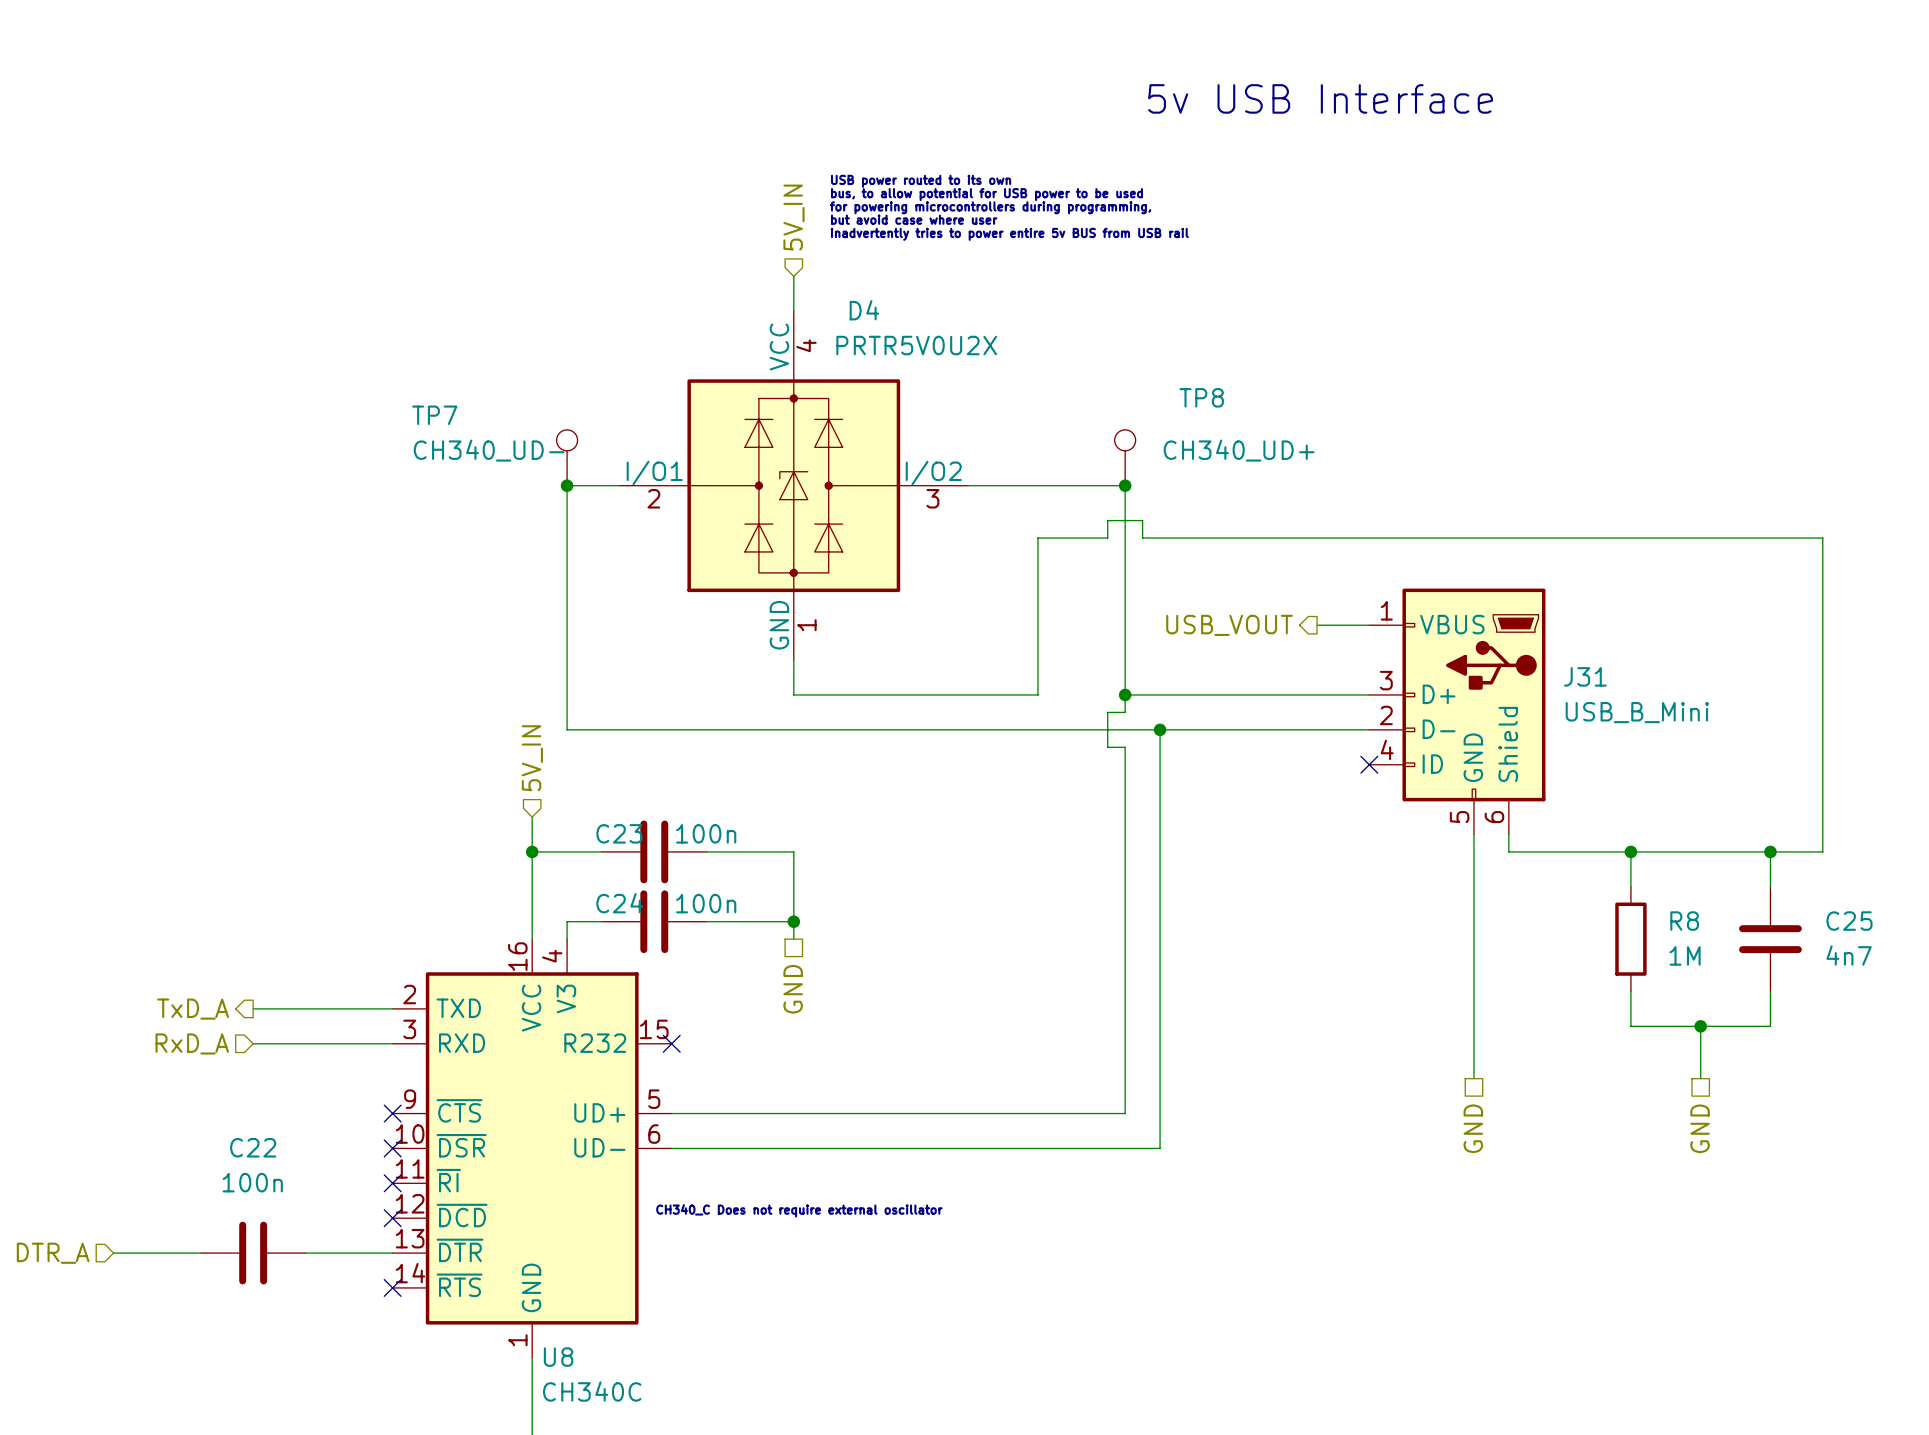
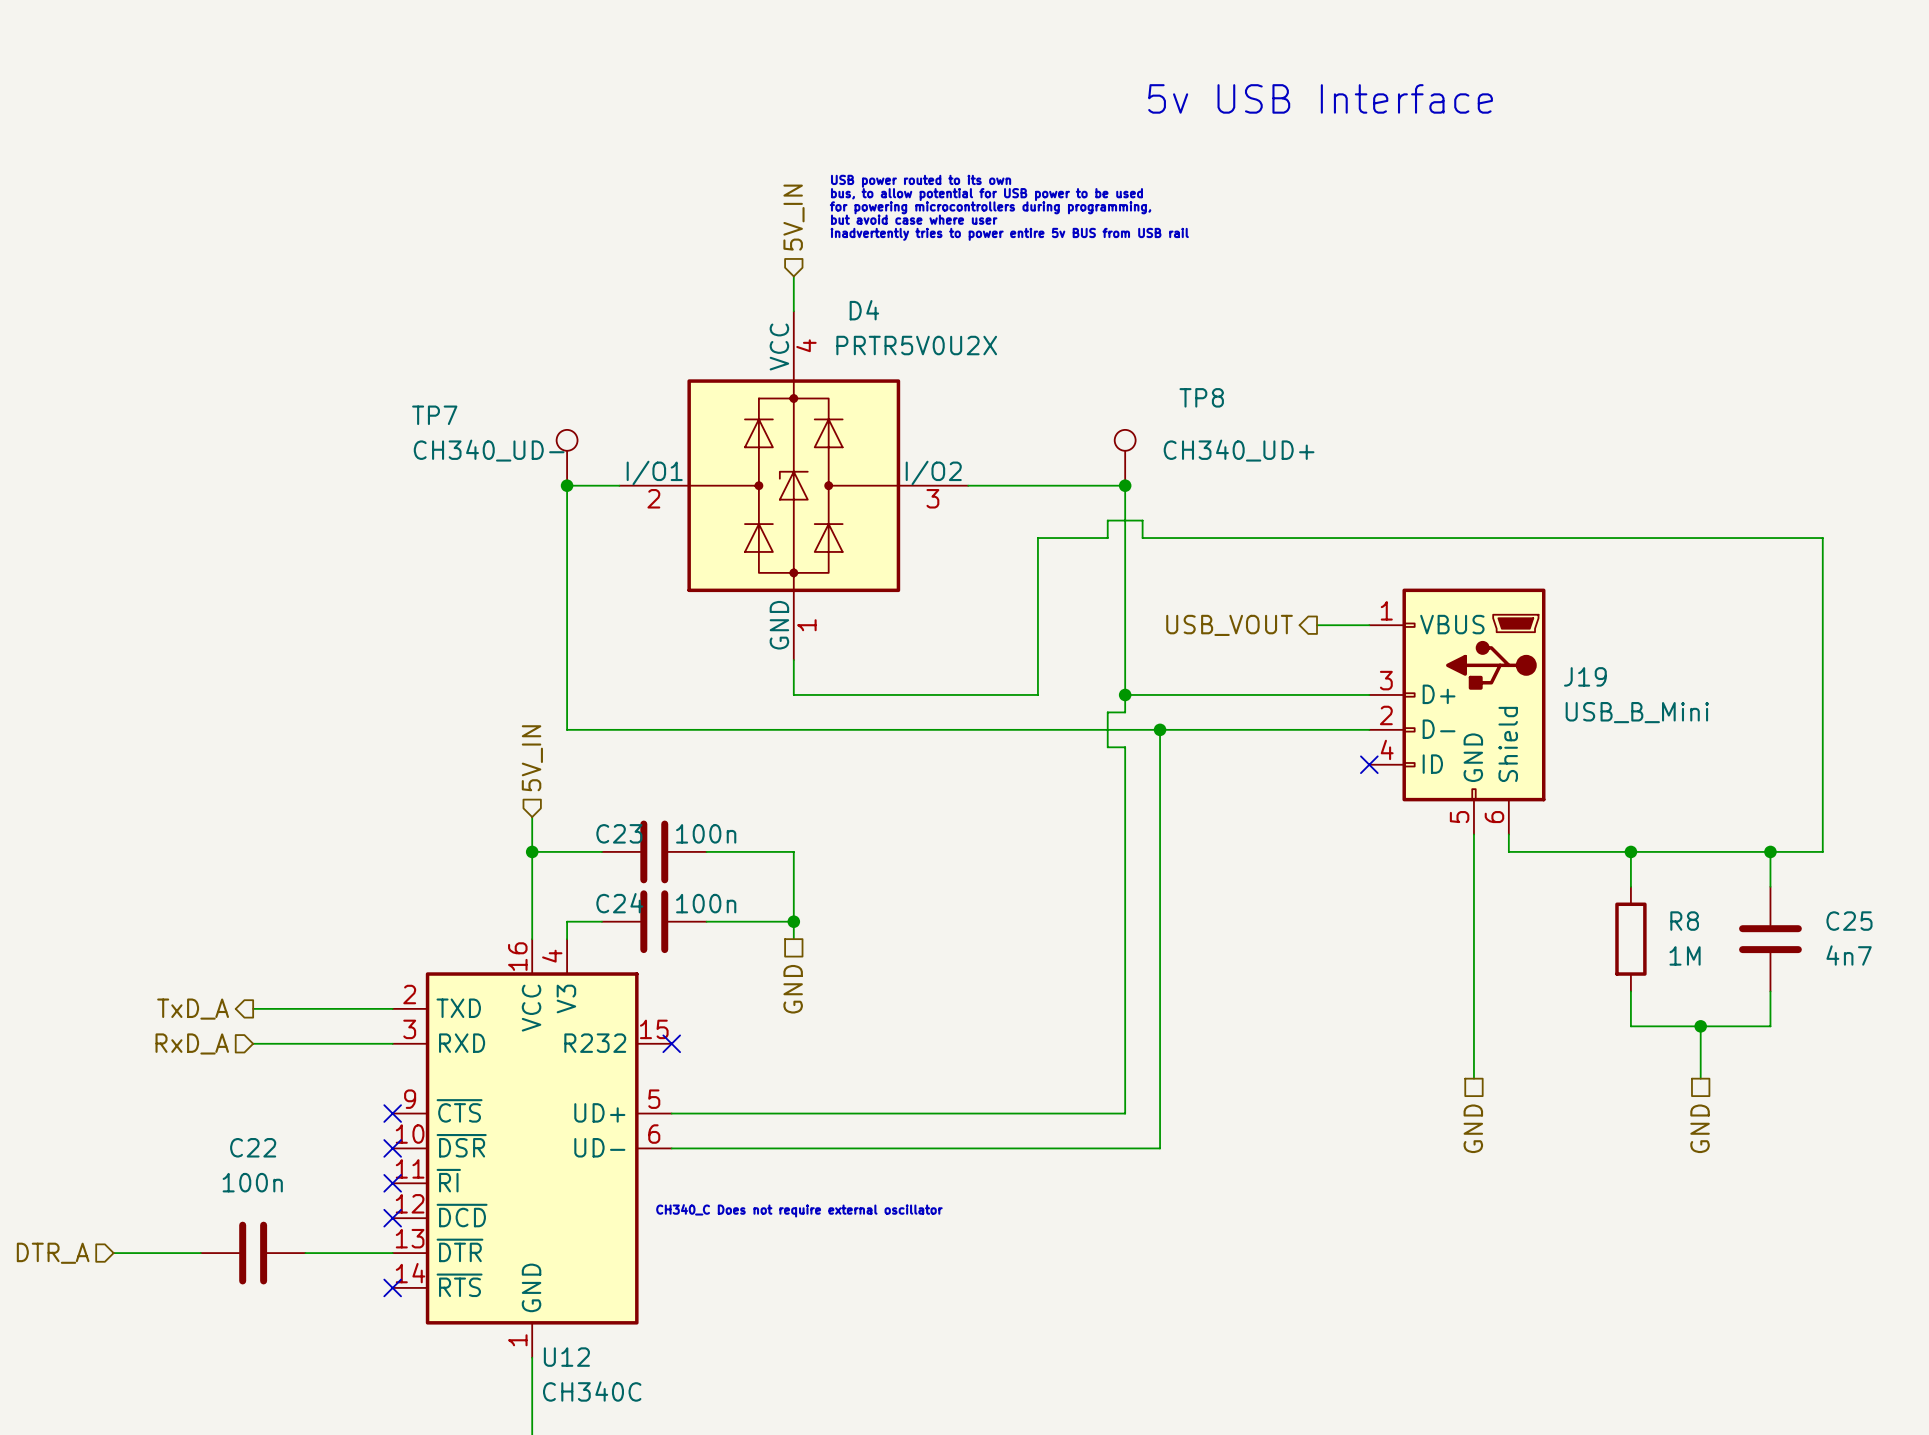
J31 name: J31 (1585, 676) -> J19 (1585, 676)
U8 name: U8 (558, 1357) -> U12 (566, 1357)

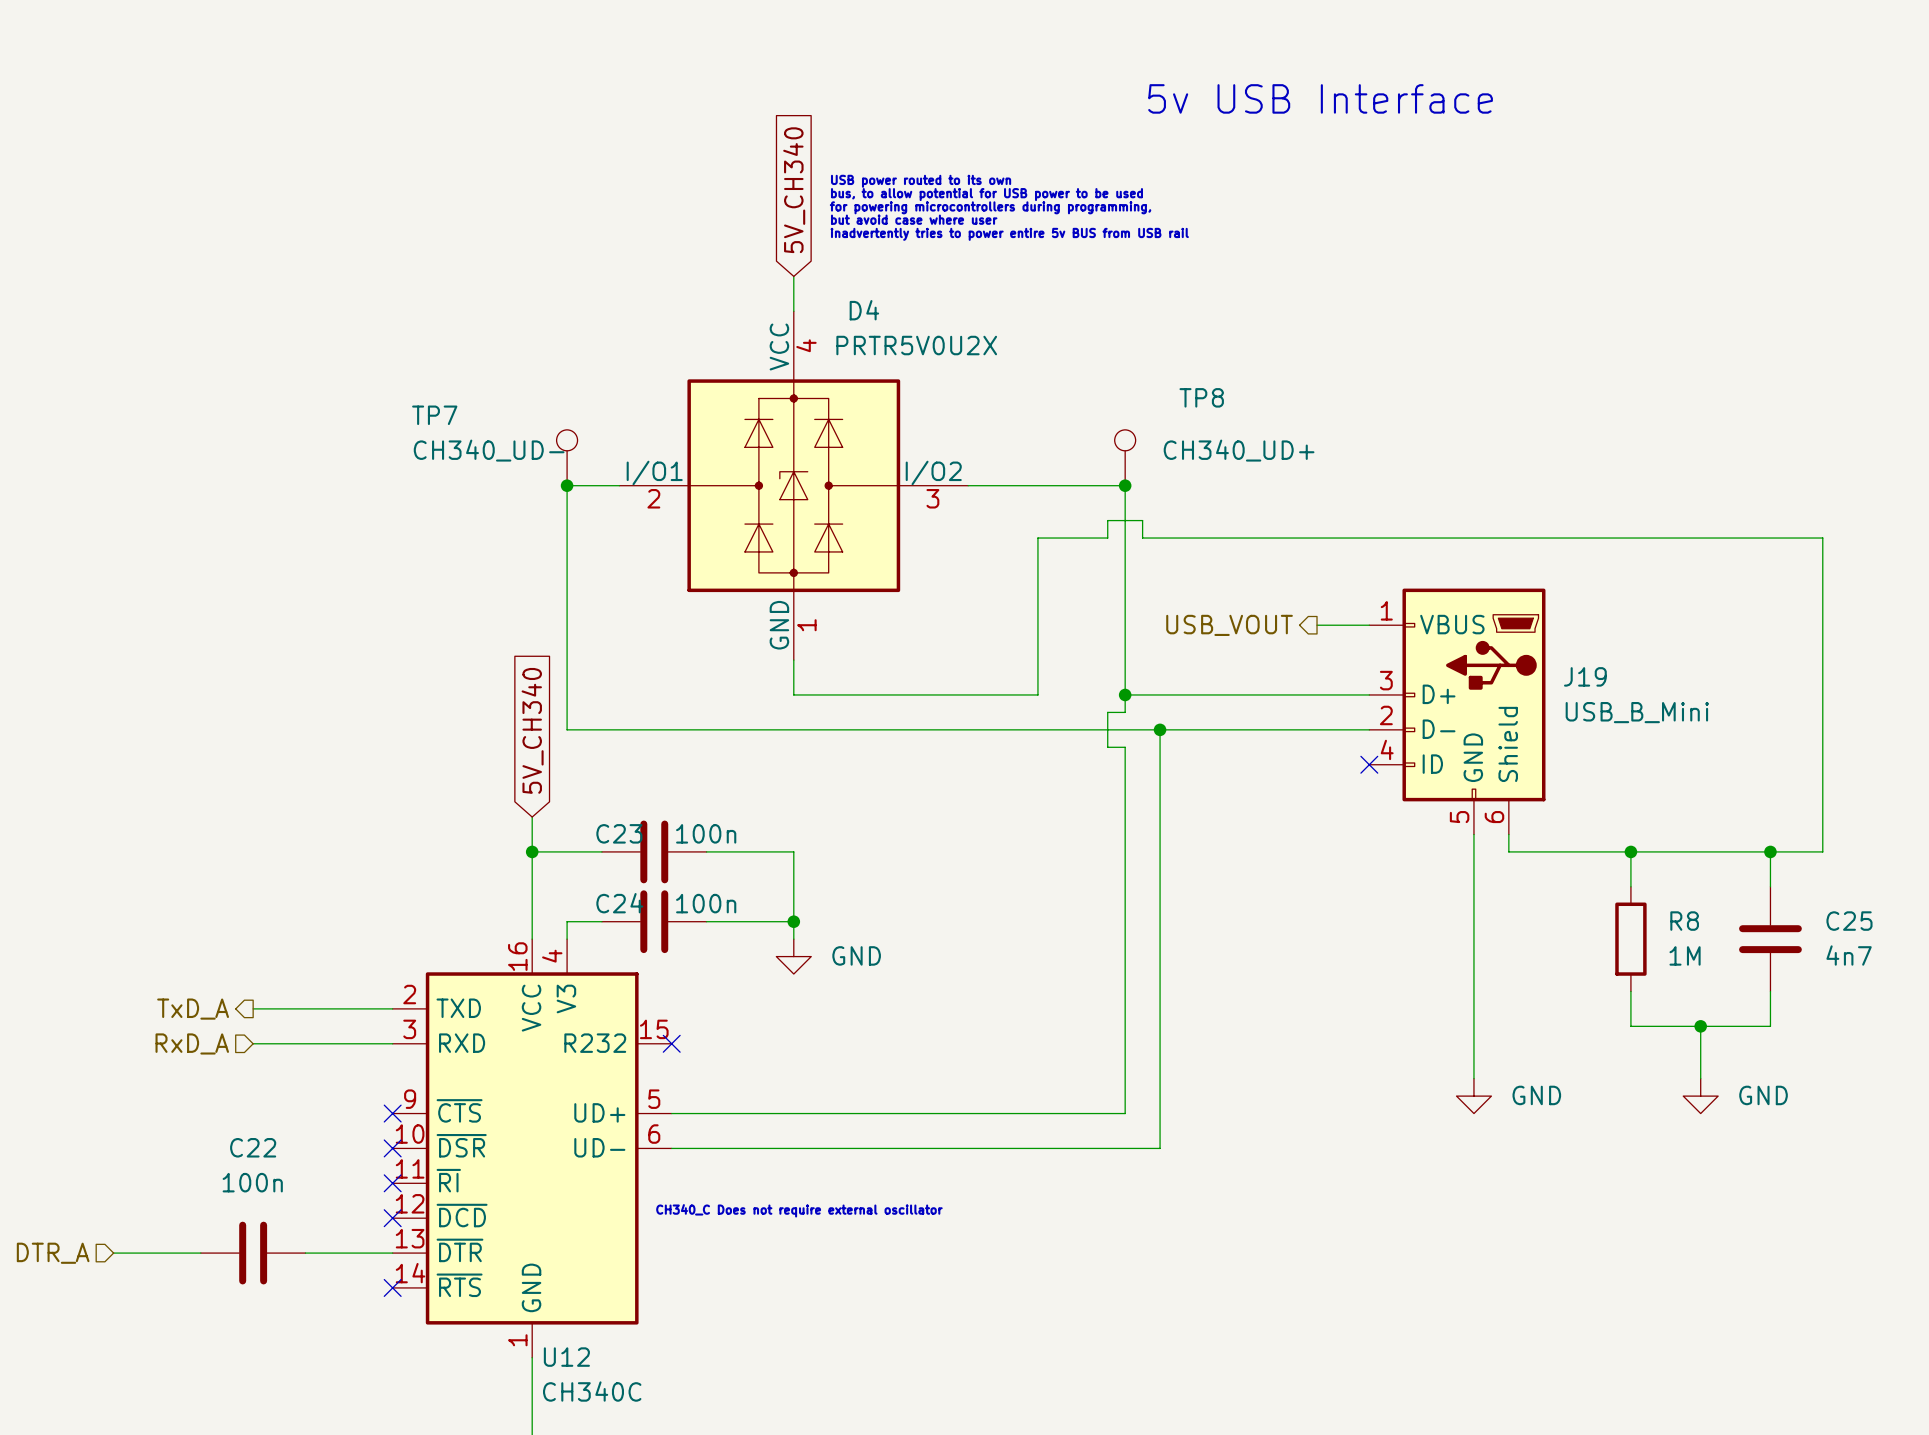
global label: none -> 5V_CH340 (794, 190)
hierarchical label: 5V_IN (793, 217) -> none
global label: none -> 5V_CH340 (532, 730)
hierarchical label: 5V_IN (532, 758) -> none
power symbol: none -> GND (793, 956)
hierarchical label: GND (793, 989) -> none
power symbol: none -> GND (1473, 1096)
power symbol: none -> GND (1700, 1096)
hierarchical label: GND (1473, 1128) -> none
hierarchical label: GND (1700, 1128) -> none

